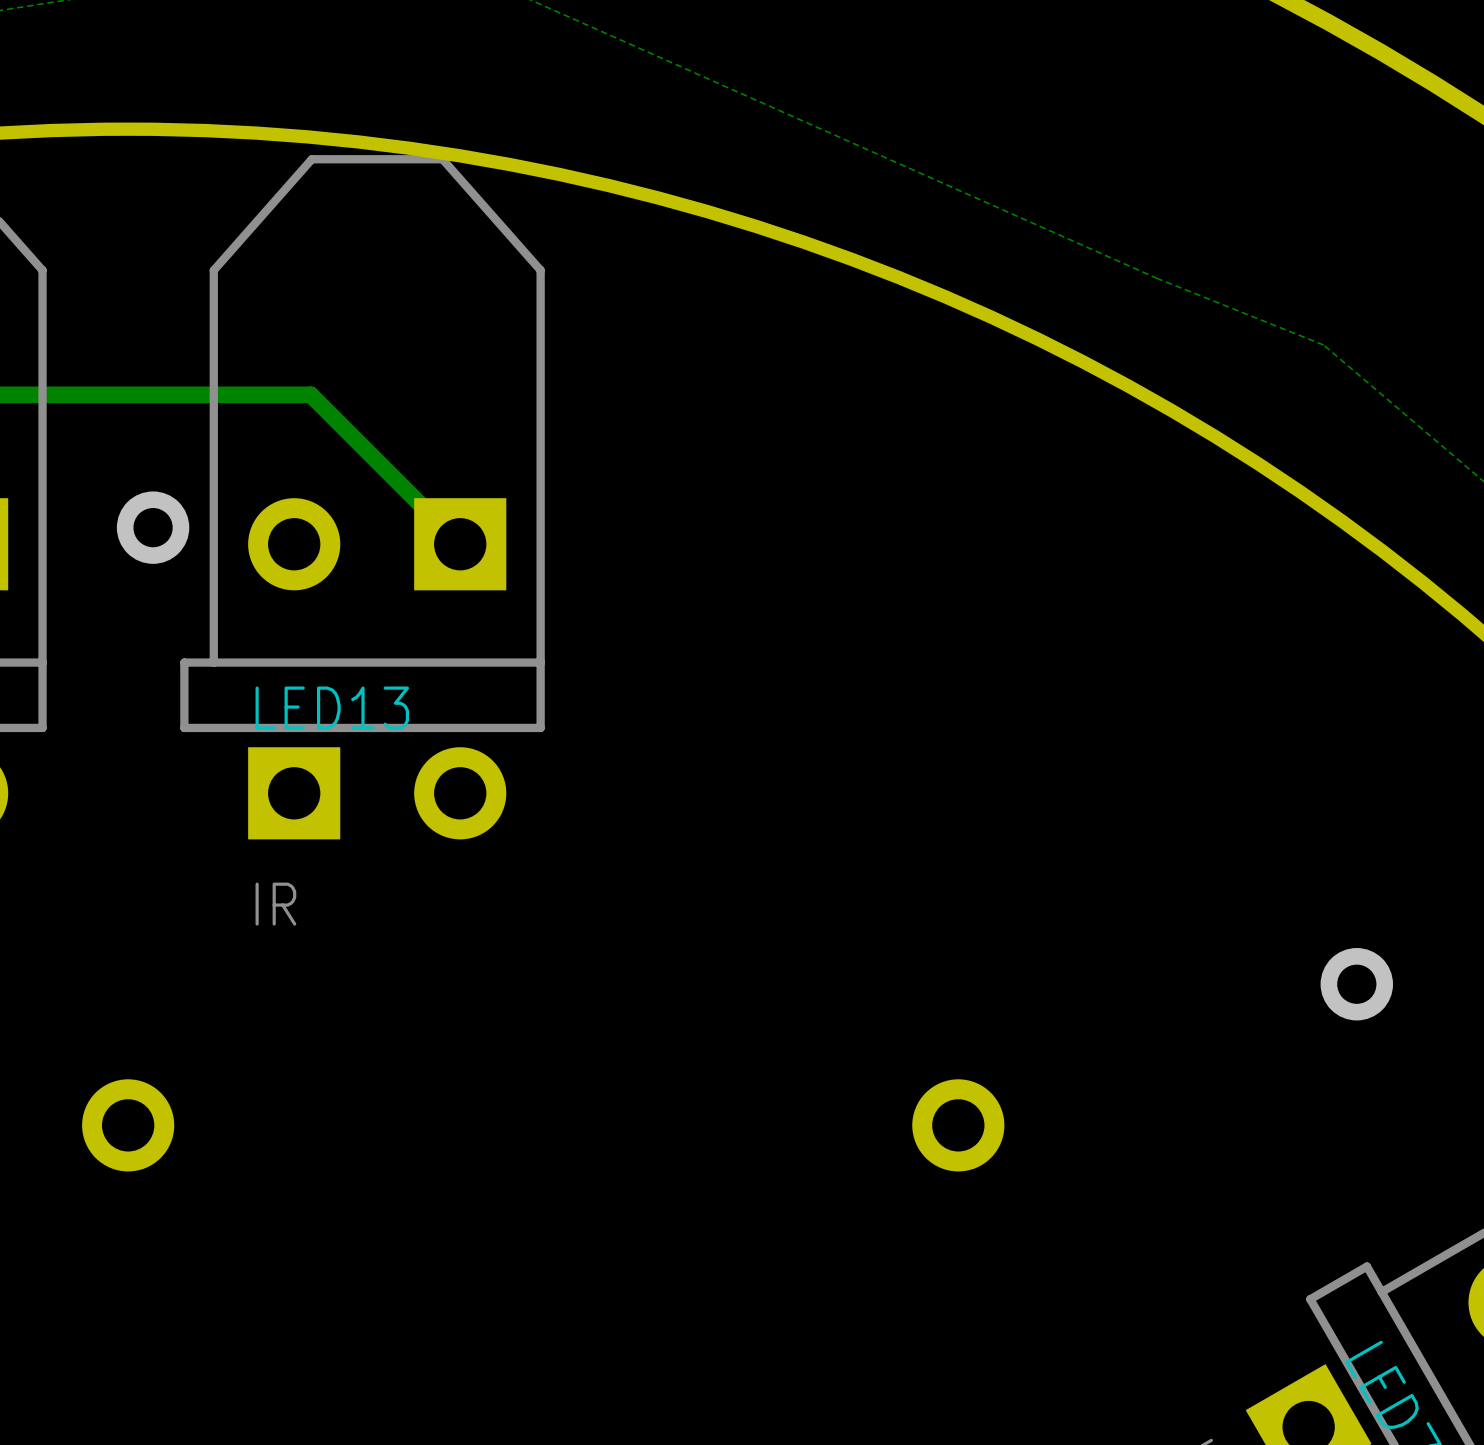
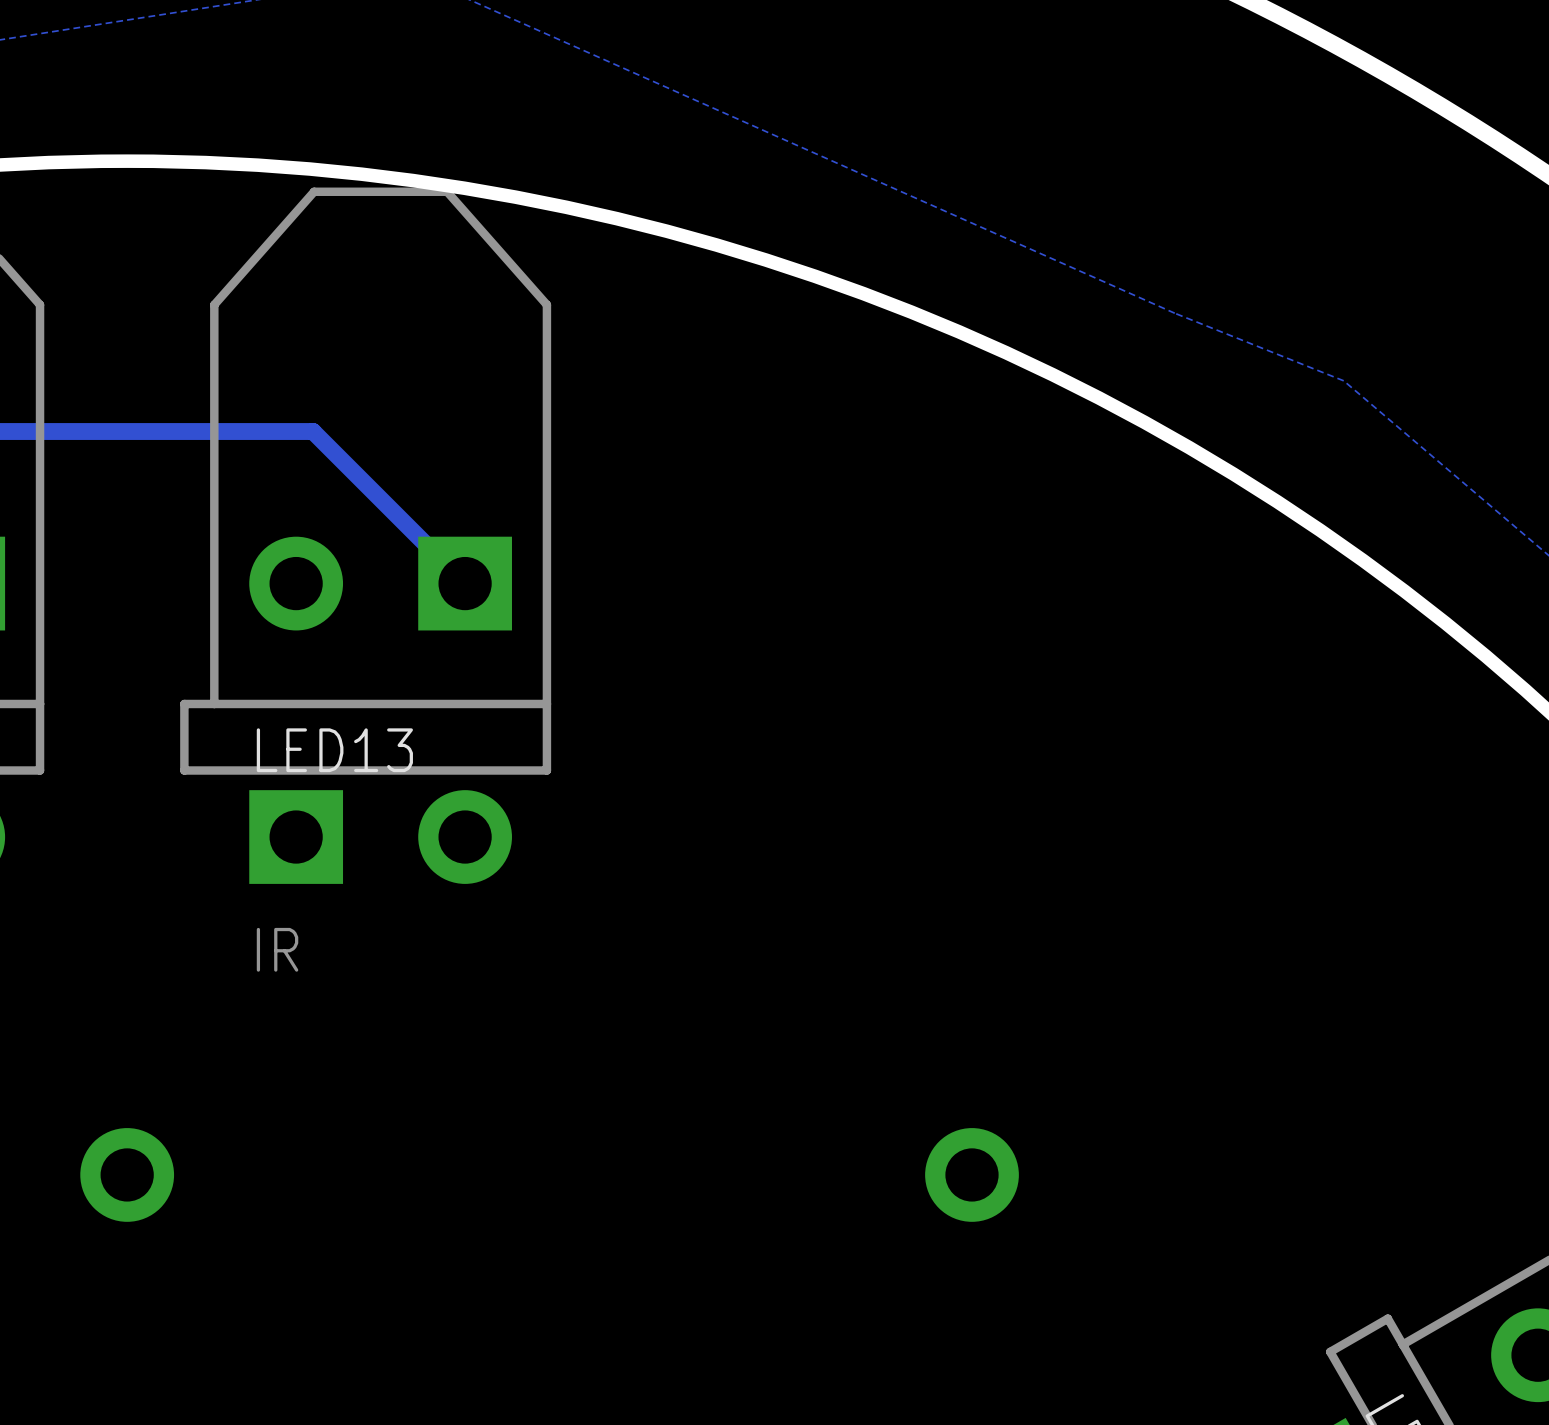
via: (153, 527) -> none
via: (1356, 984) -> none

